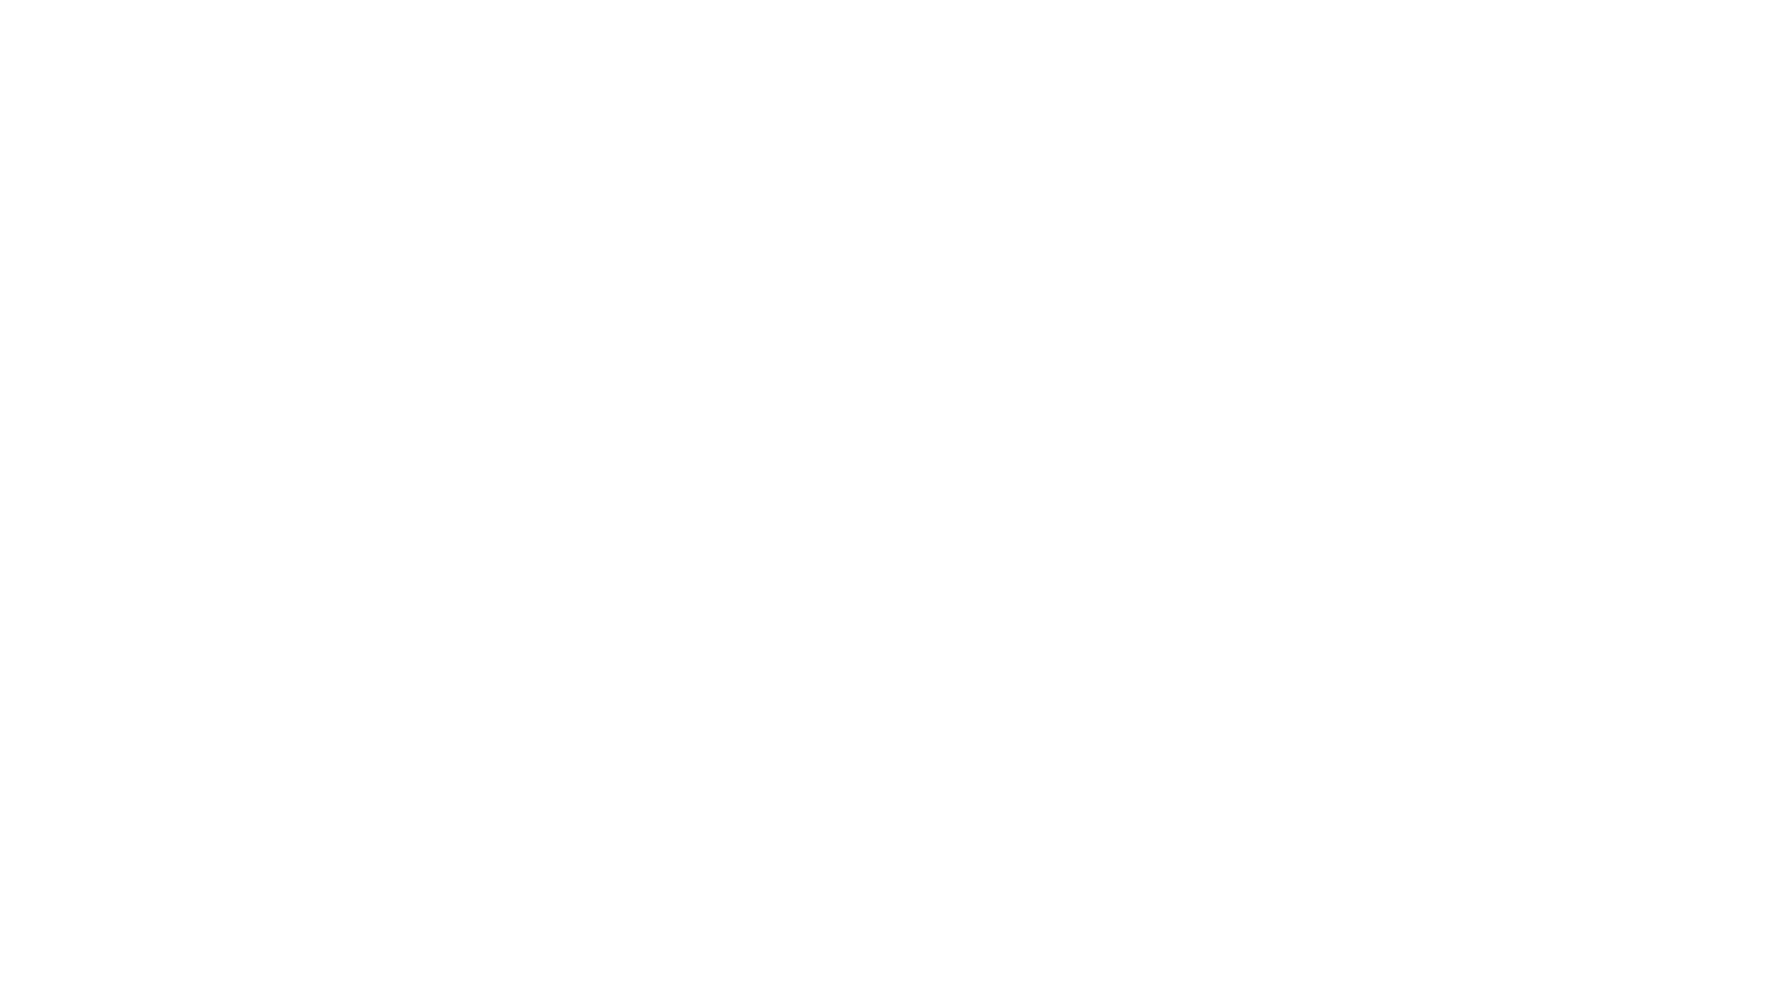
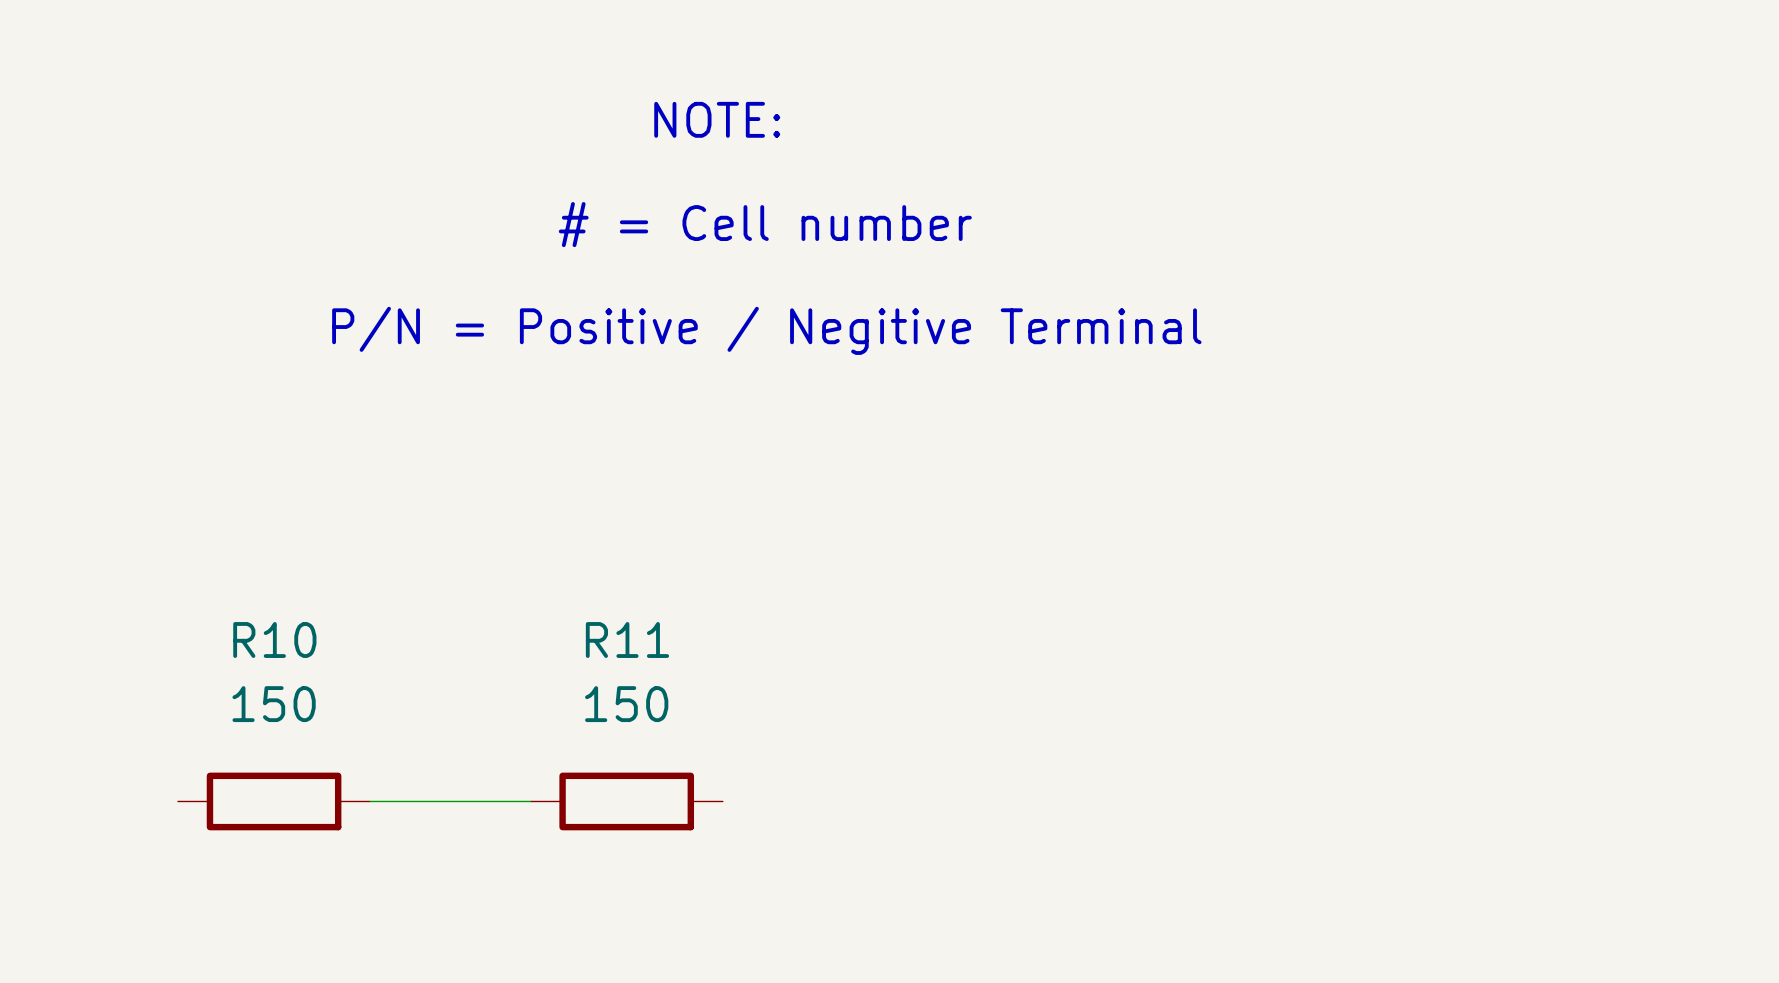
text: none -> NOTE: (717, 119)
text: none -> # = Cell number (765, 224)
text: none -> P/N = Positive / Negitive Terminal (766, 330)
R10: none -> 150 (274, 801)
wire: none -> (370, 801) (530, 801)
R11: none -> 150 (626, 801)

